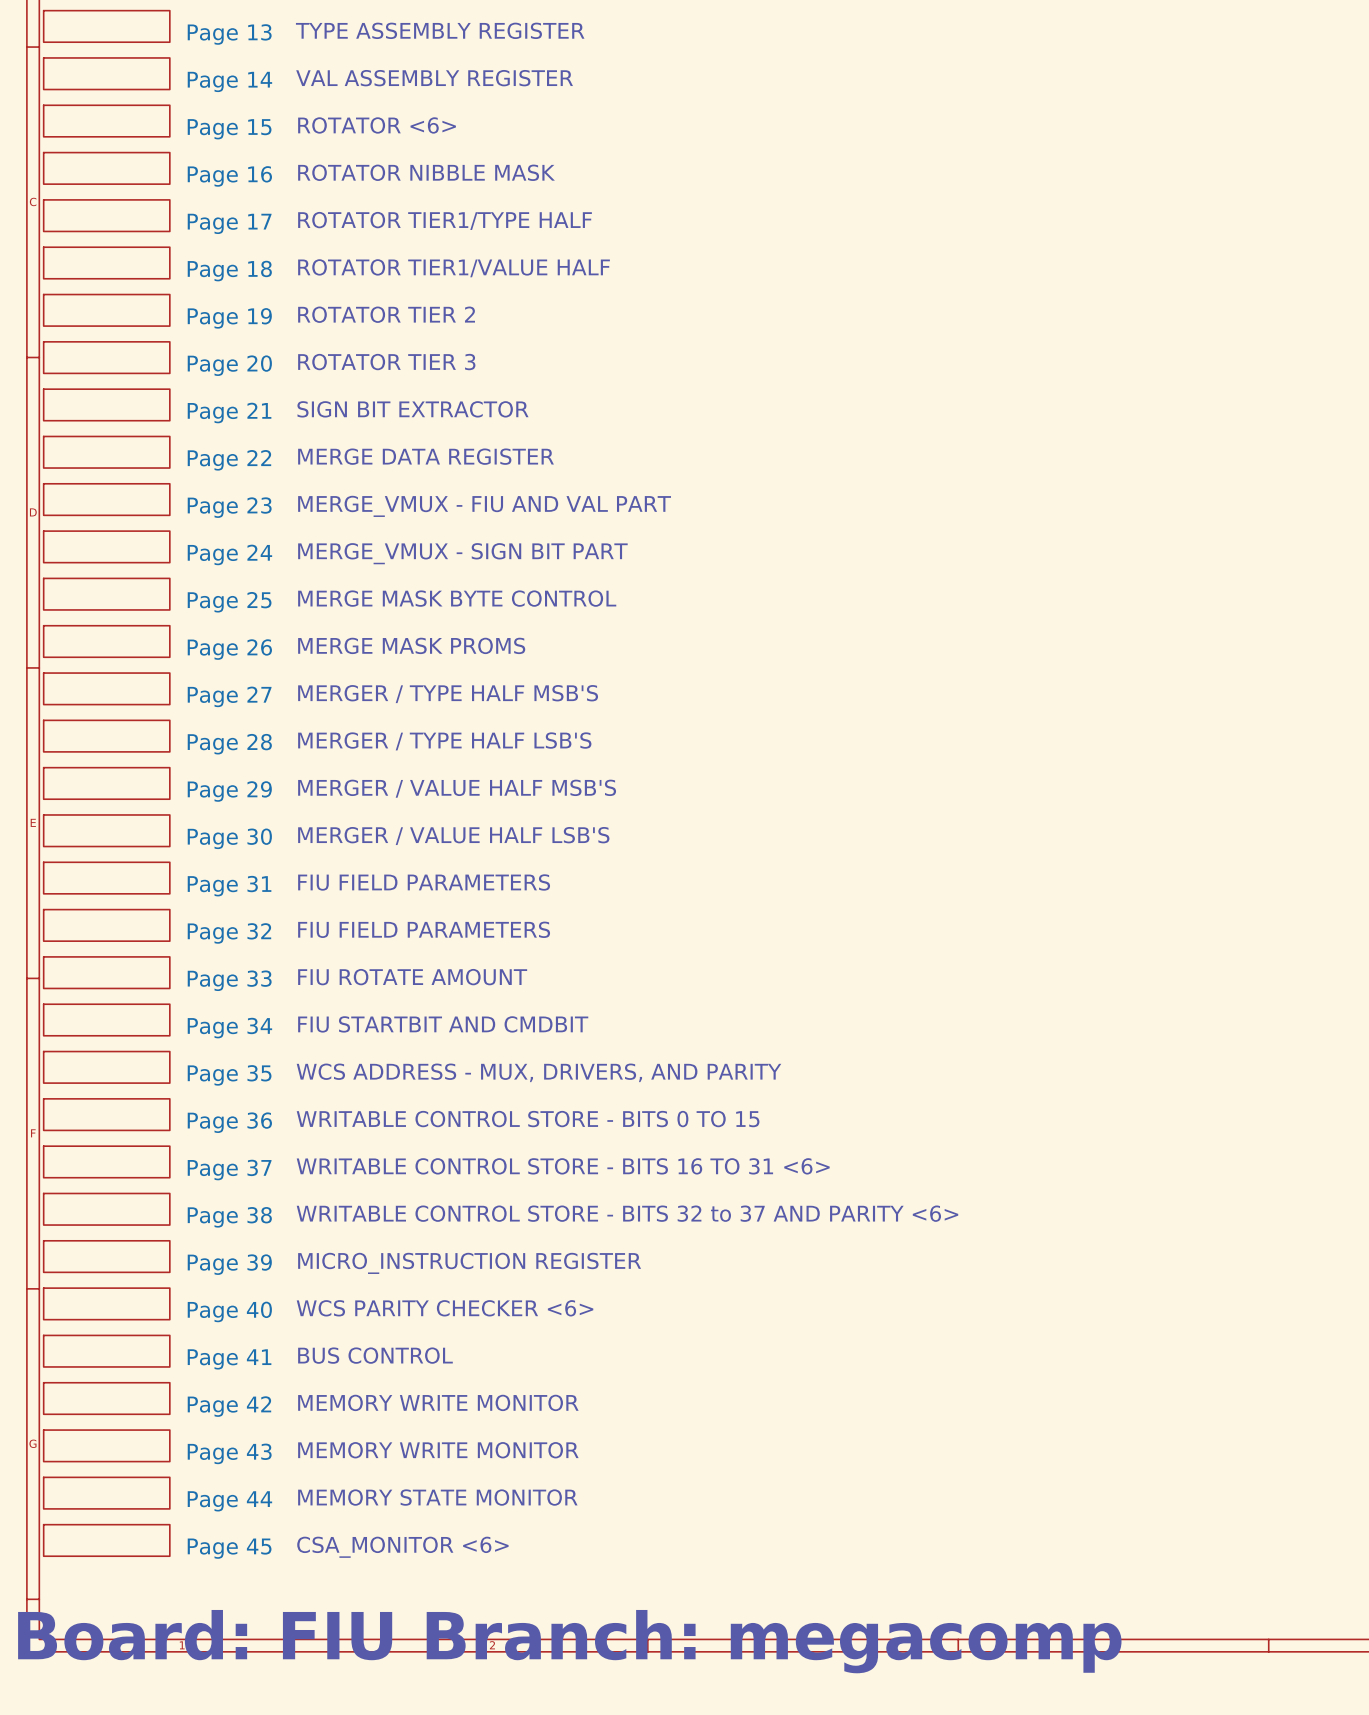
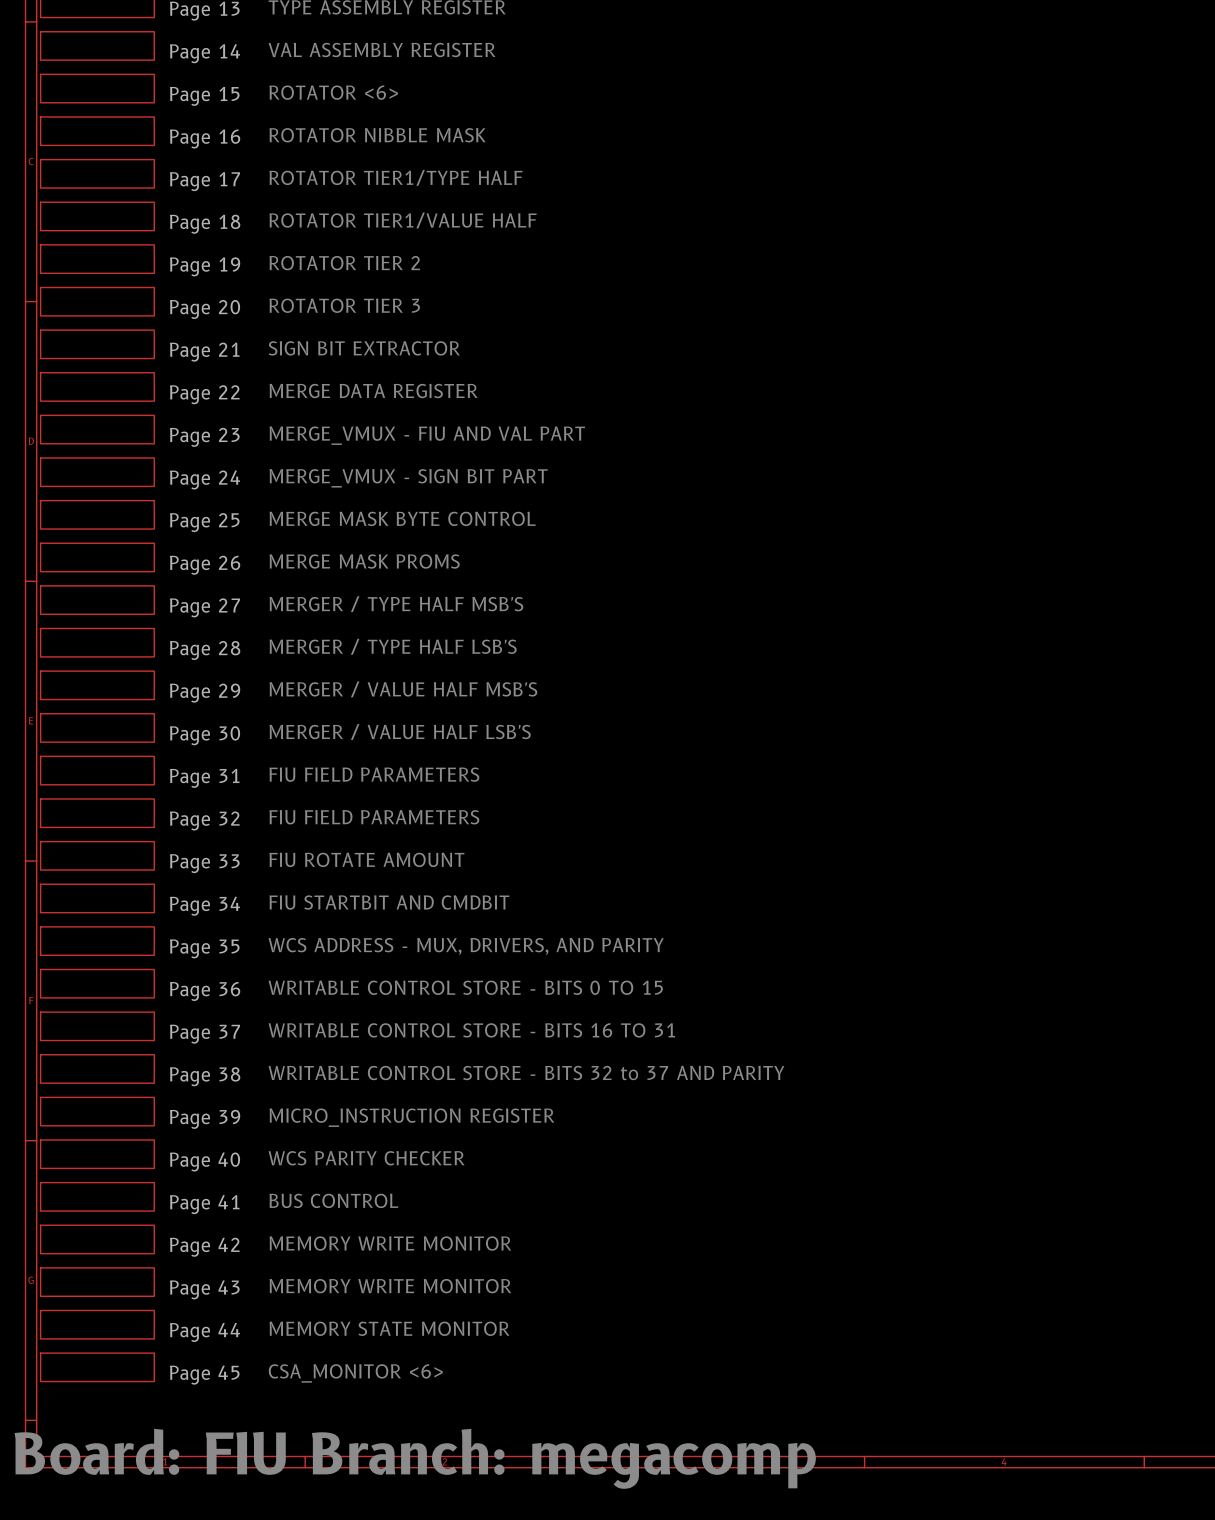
text: WRITABLE CONTROL STORE - BITS 16 TO 31 <6> (563, 1166) -> WRITABLE CONTROL STORE - BITS 16 TO 31 (471, 1030)
text: WRITABLE CONTROL STORE - BITS 32 to 37 AND PARITY <6> (627, 1213) -> WRITABLE CONTROL STORE - BITS 32 to 37 AND PARITY (526, 1073)
text: WCS PARITY CHECKER <6> (445, 1308) -> WCS PARITY CHECKER (366, 1158)

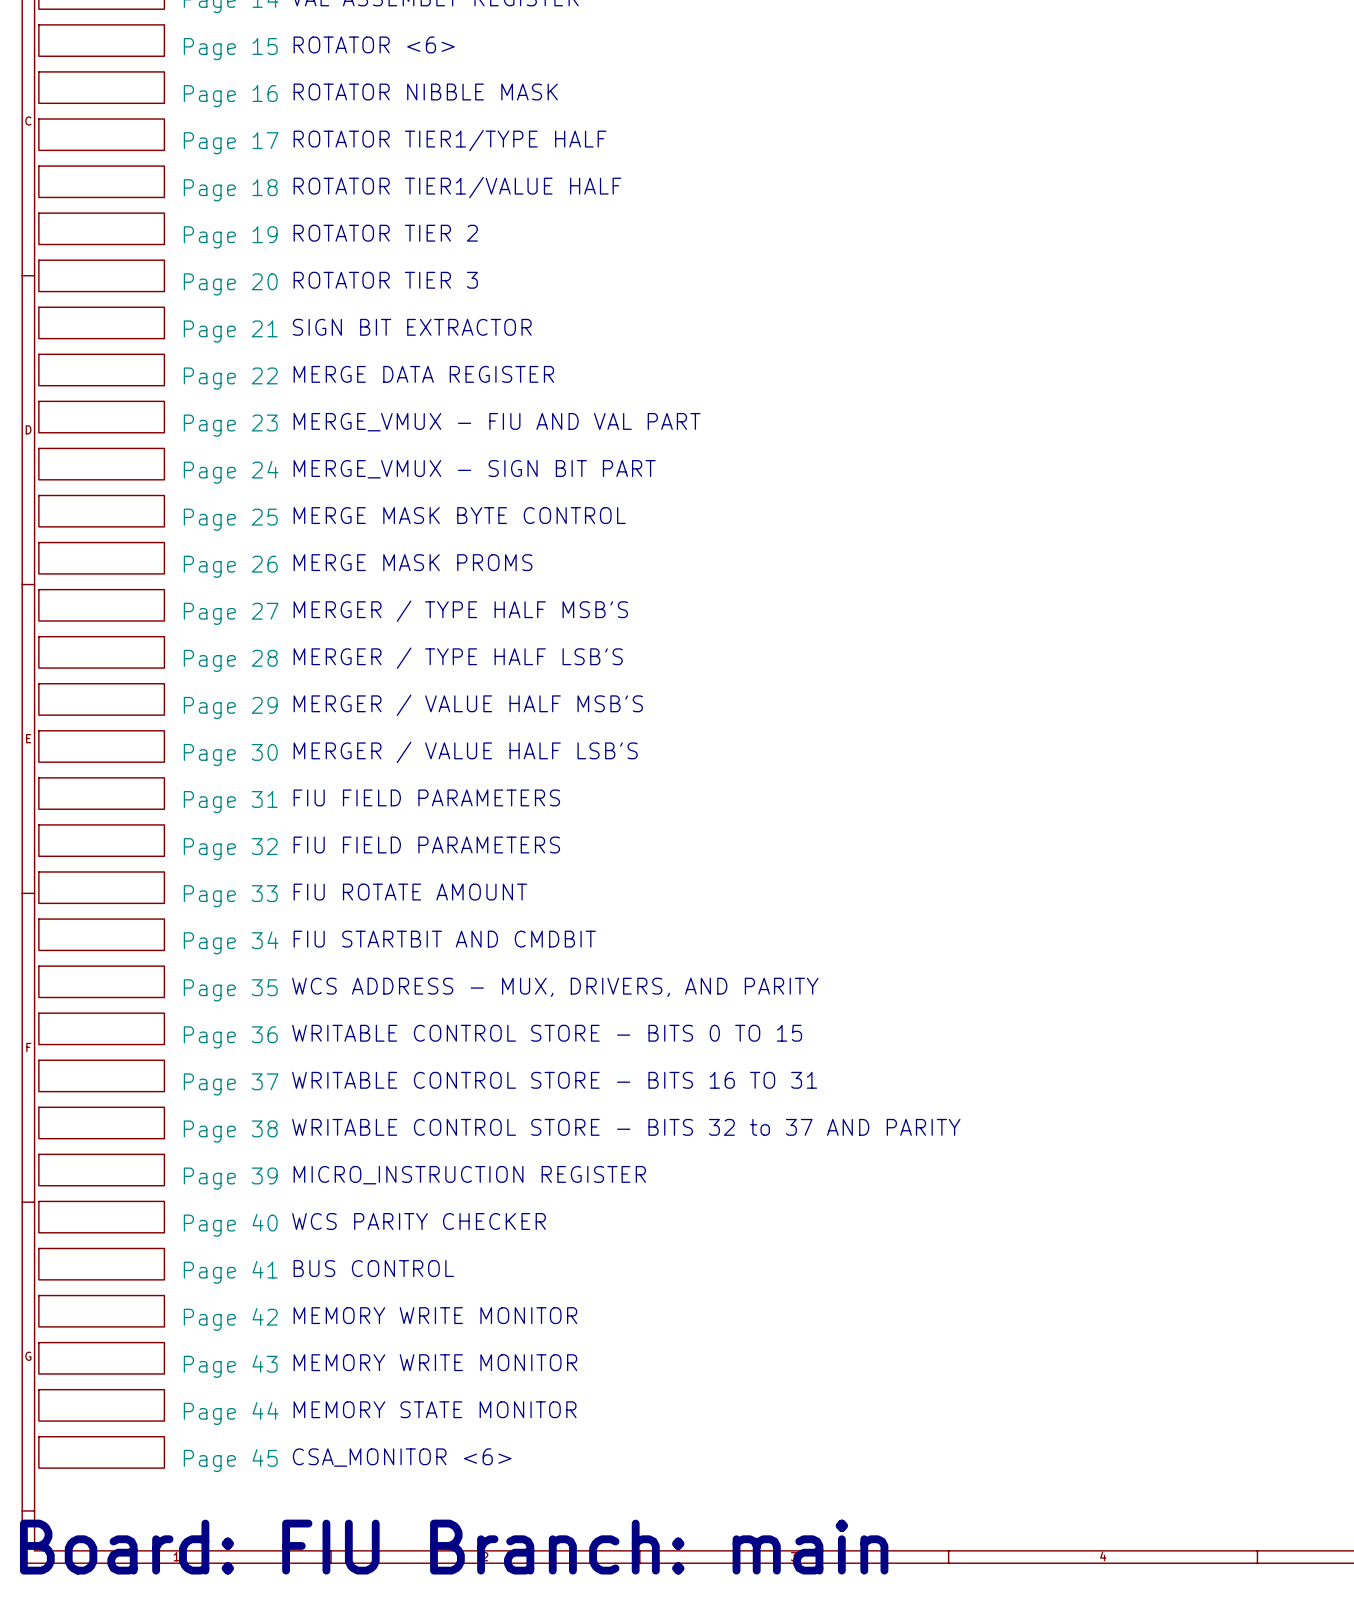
text: Board: FIU Branch: megacomp (415, 1458) -> Board: FIU Branch: main (454, 1547)

